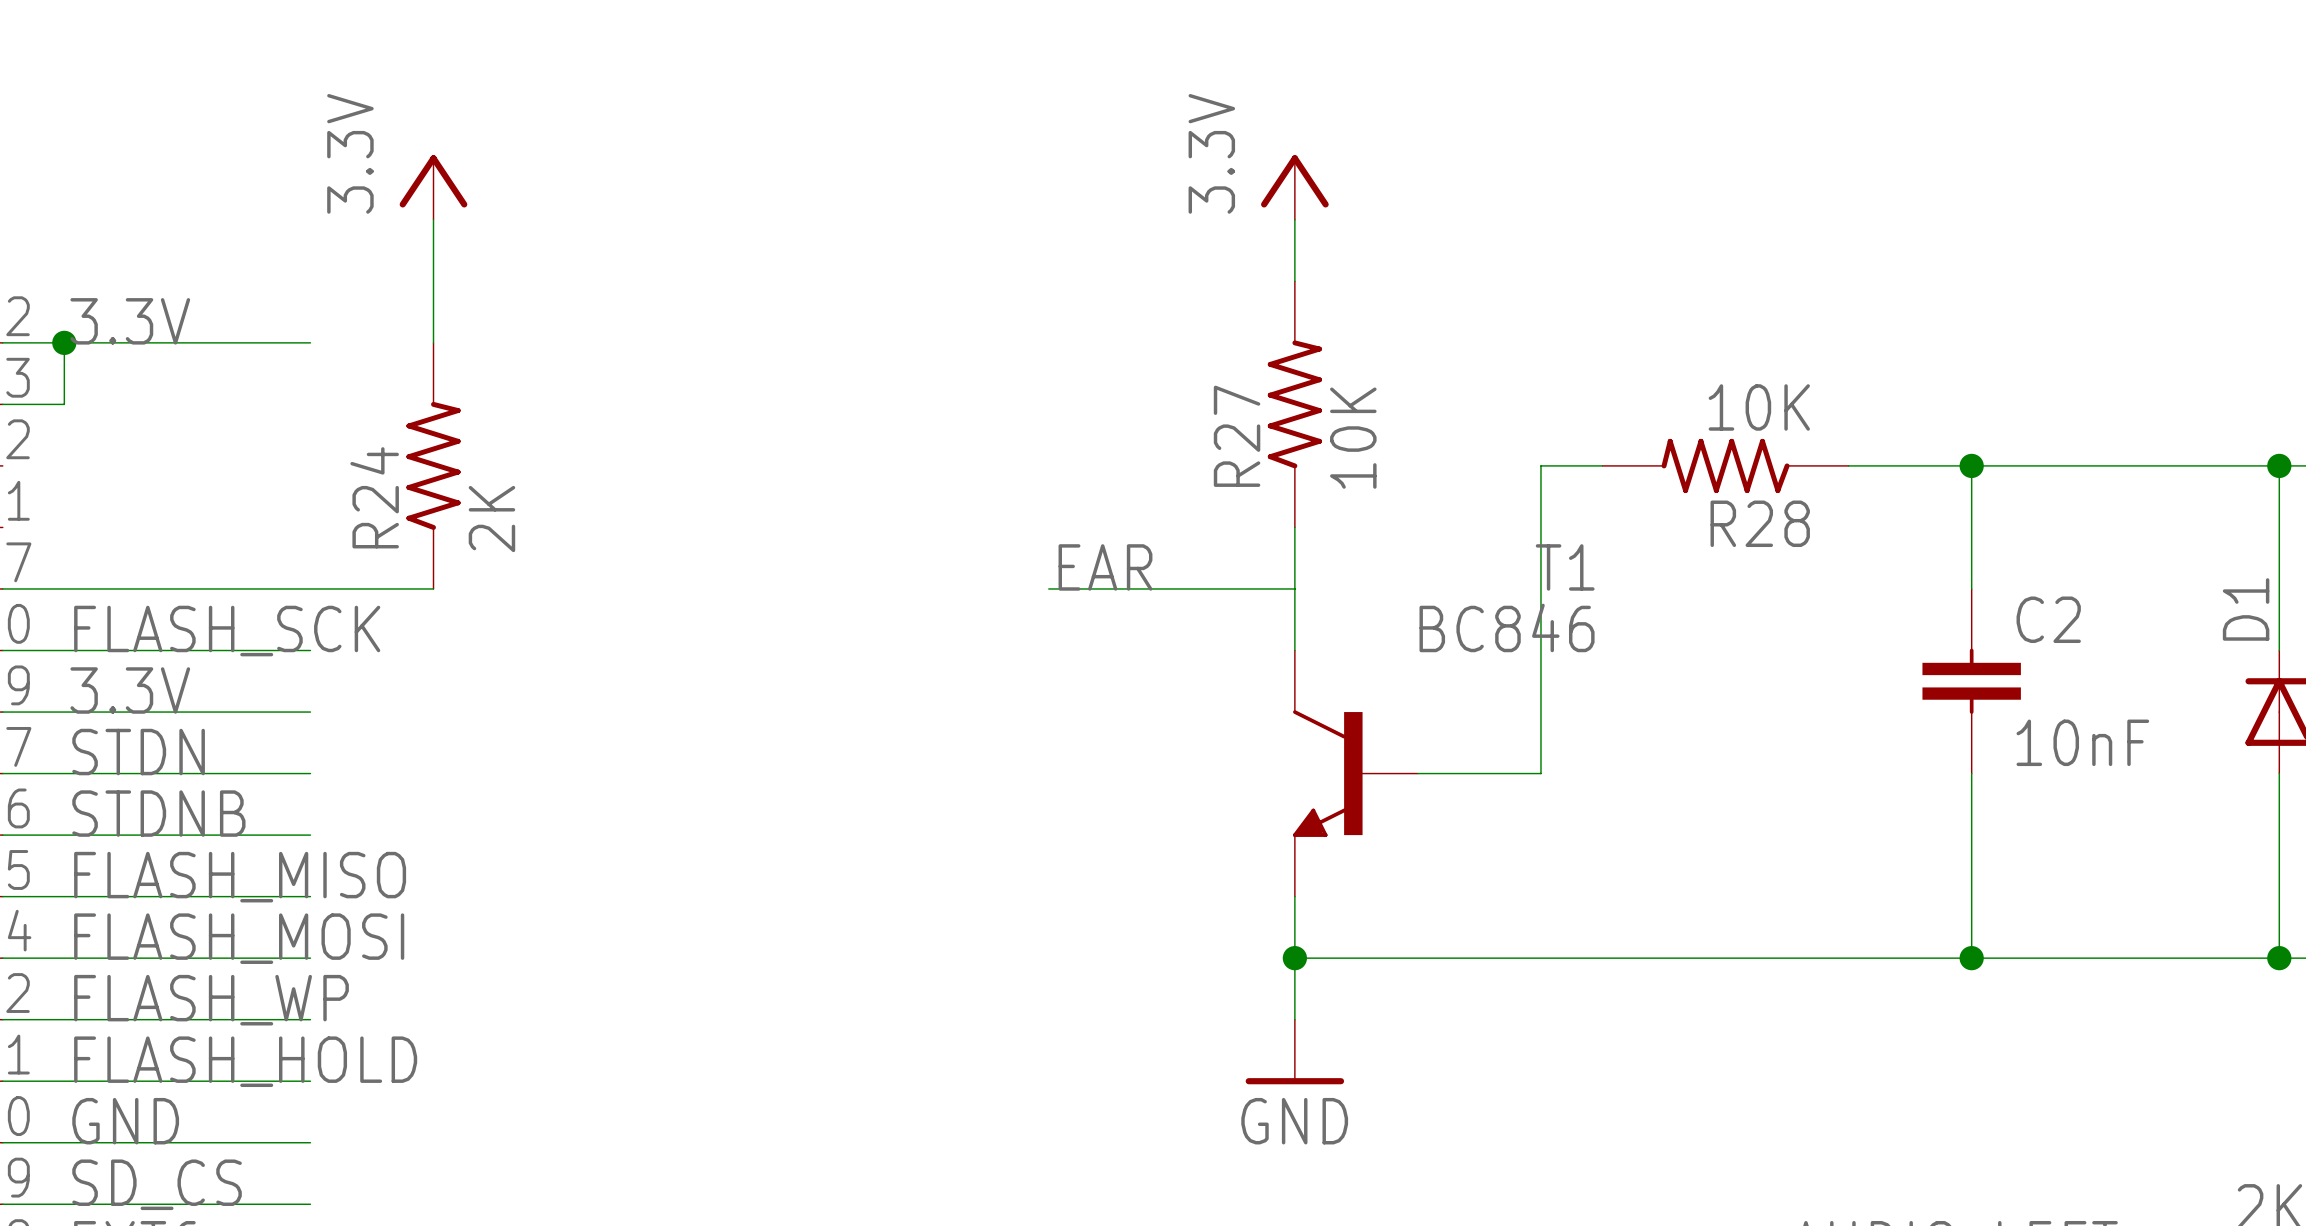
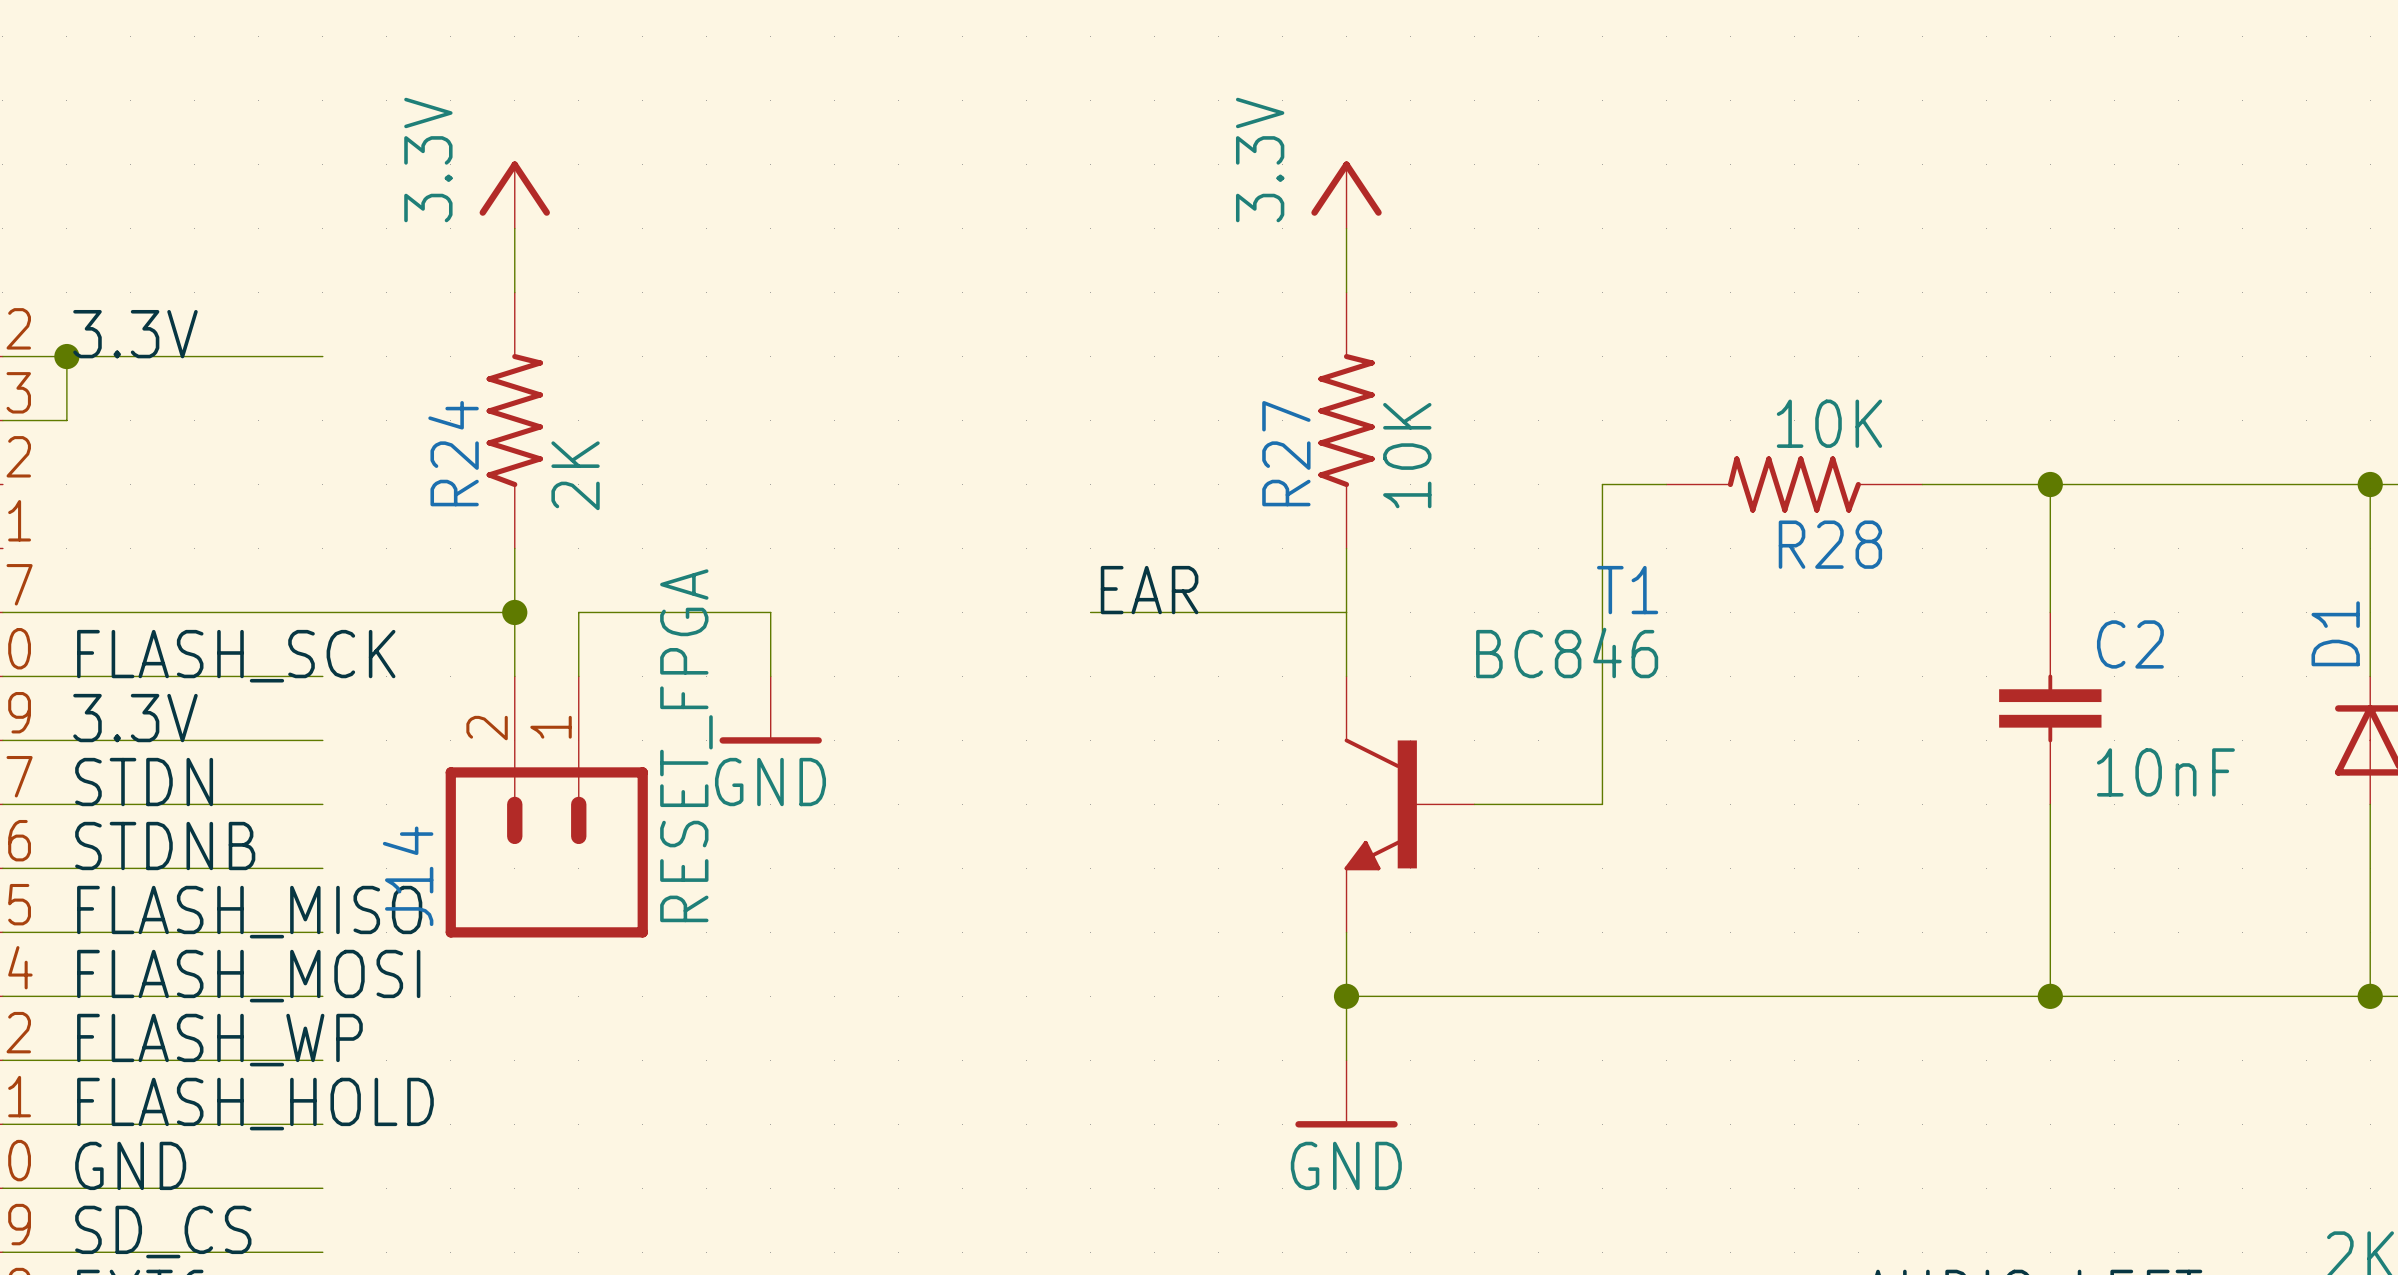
power symbol position: 3.3V (433, 187) -> 3.3V (514, 195)
wire: (433, 219) (433, 342) -> (514, 548) (514, 676)
wire: none -> (514, 228) (514, 292)
R24 position: (433, 465) -> (514, 420)
wire: none -> (450, 612) (514, 612)
junction: none -> (514, 612)
wire: none -> (578, 676) (578, 612) (770, 612) (770, 676)
power symbol: none -> GND (770, 710)
J14: none -> RESET_FPGA (546, 806)

